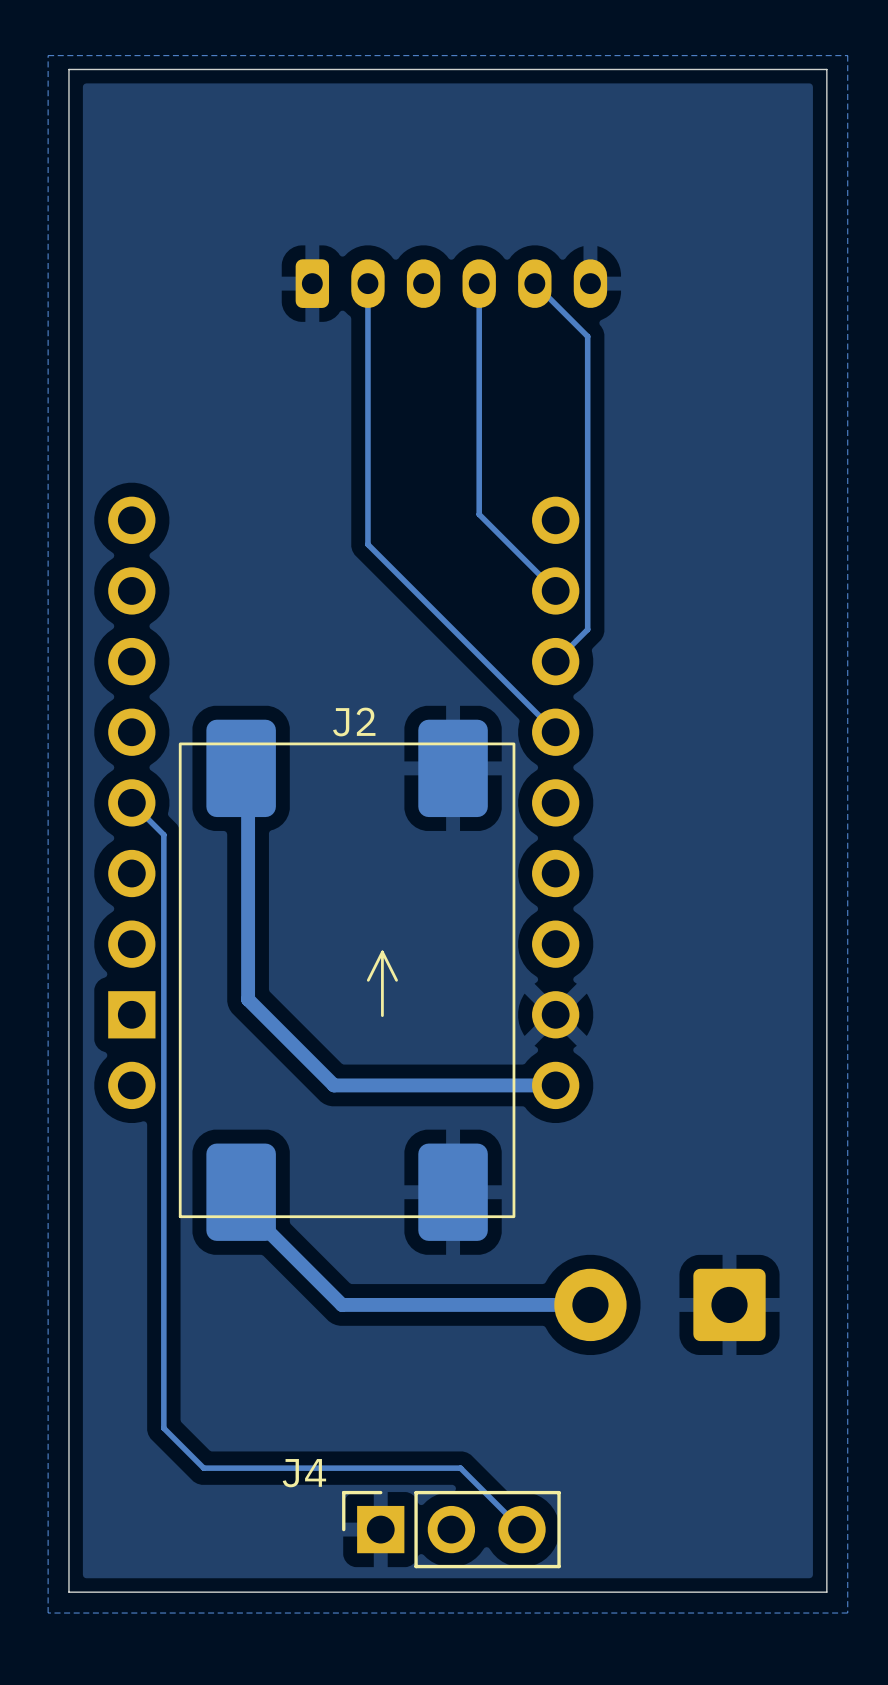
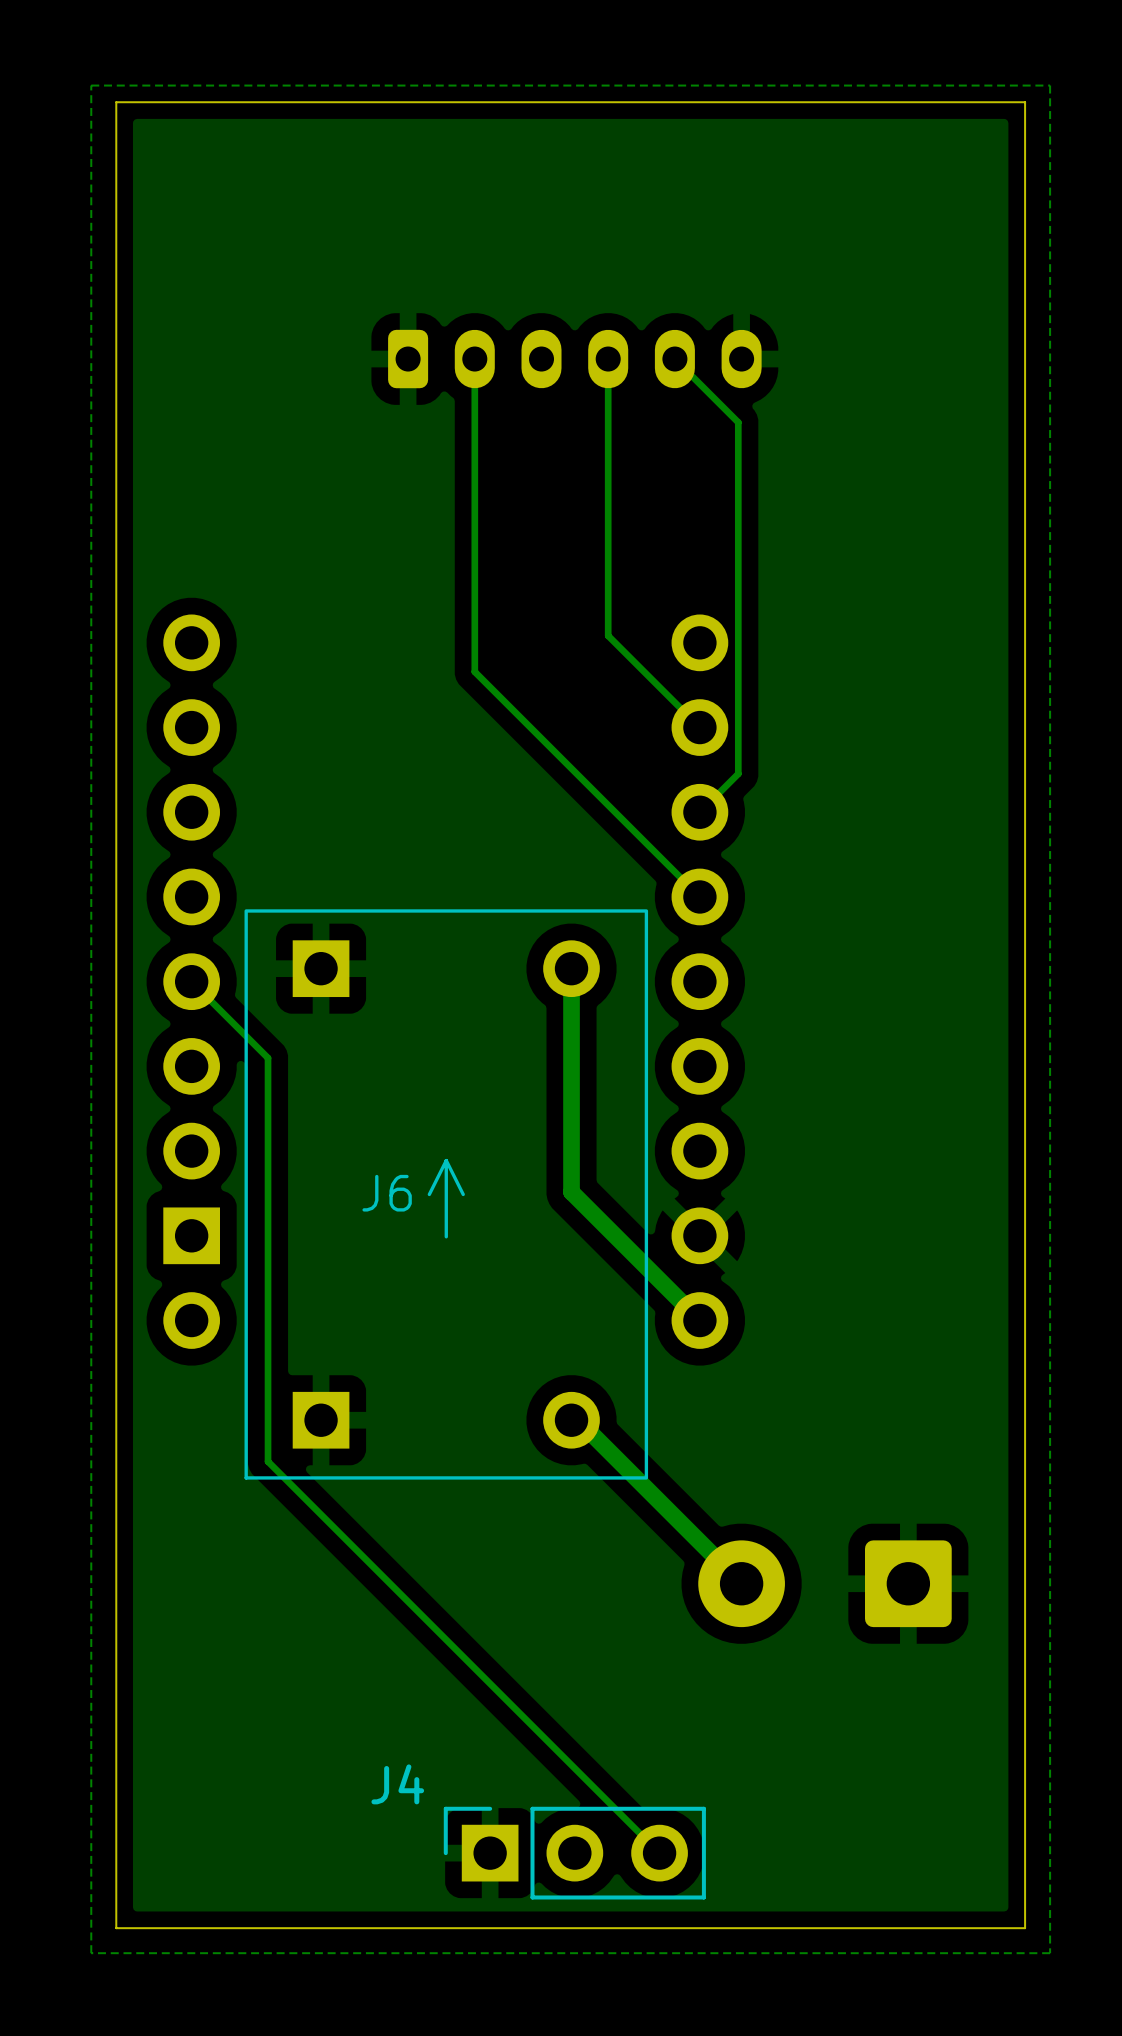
track: (241, 768) (248, 775) (248, 999) (334, 1085) (555, 1085) -> (571, 968) (571, 1192) (699, 1320)
track: (163, 834) (163, 1428) (203, 1468) (460, 1468) -> (230, 1020) (268, 1058) (268, 1461) (585, 1779)
J6: none -> (446, 1194)
J2: (347, 980) -> none
track: (241, 1192) (248, 1199) (248, 1211) (342, 1304) (590, 1304) -> (571, 1420) (578, 1420) (741, 1583)

